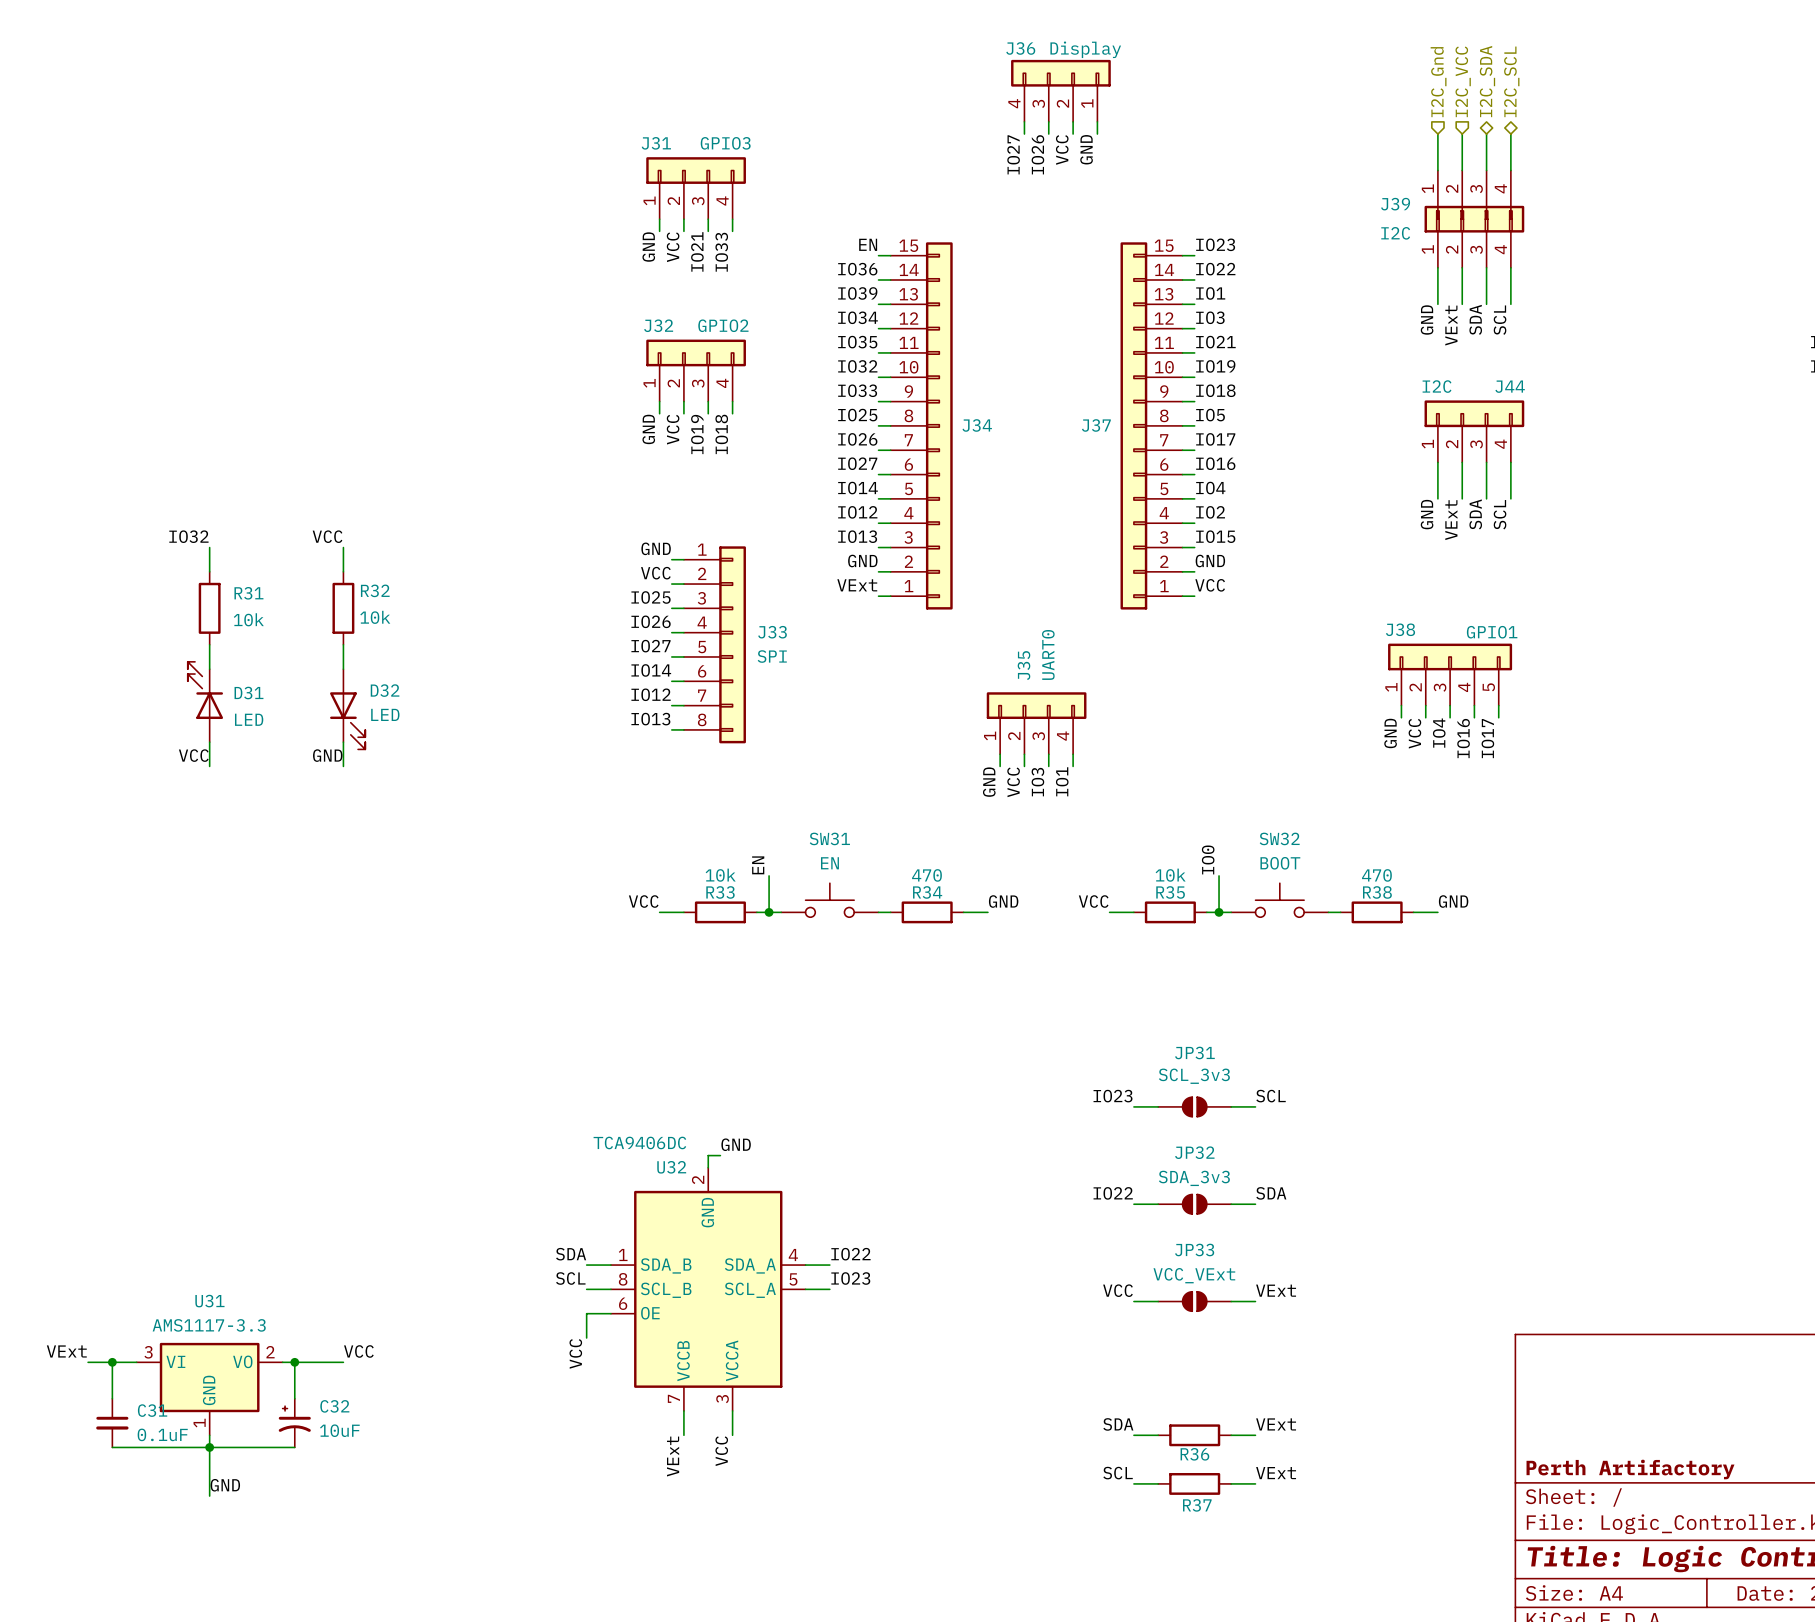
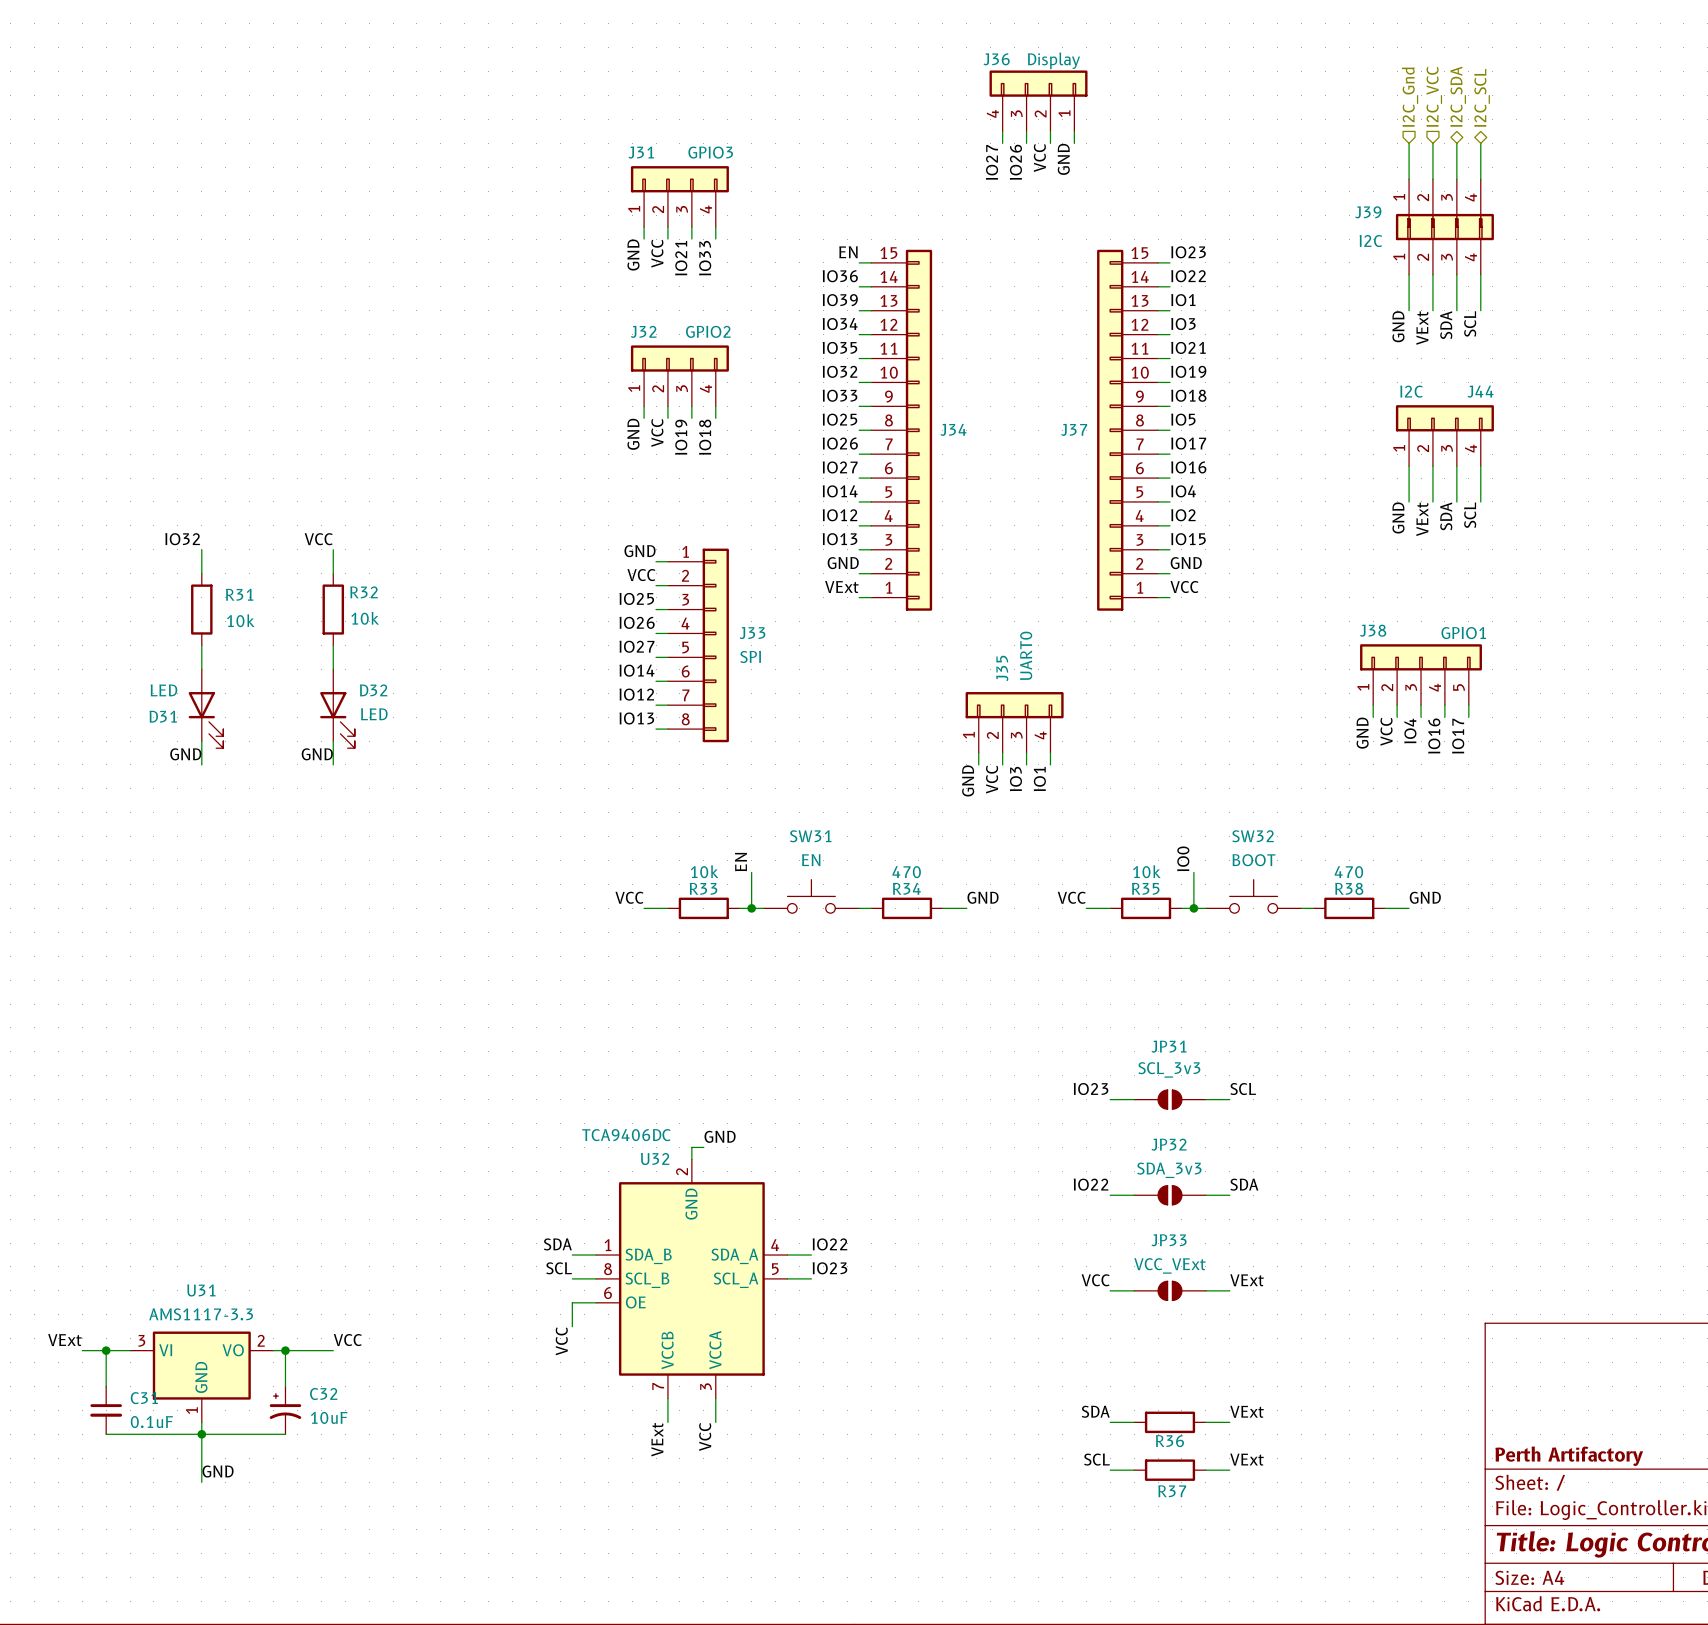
D31 rotation: 0° (205, 690) -> 180° (205, 720)
label: VCC (193, 755) -> GND (185, 754)

